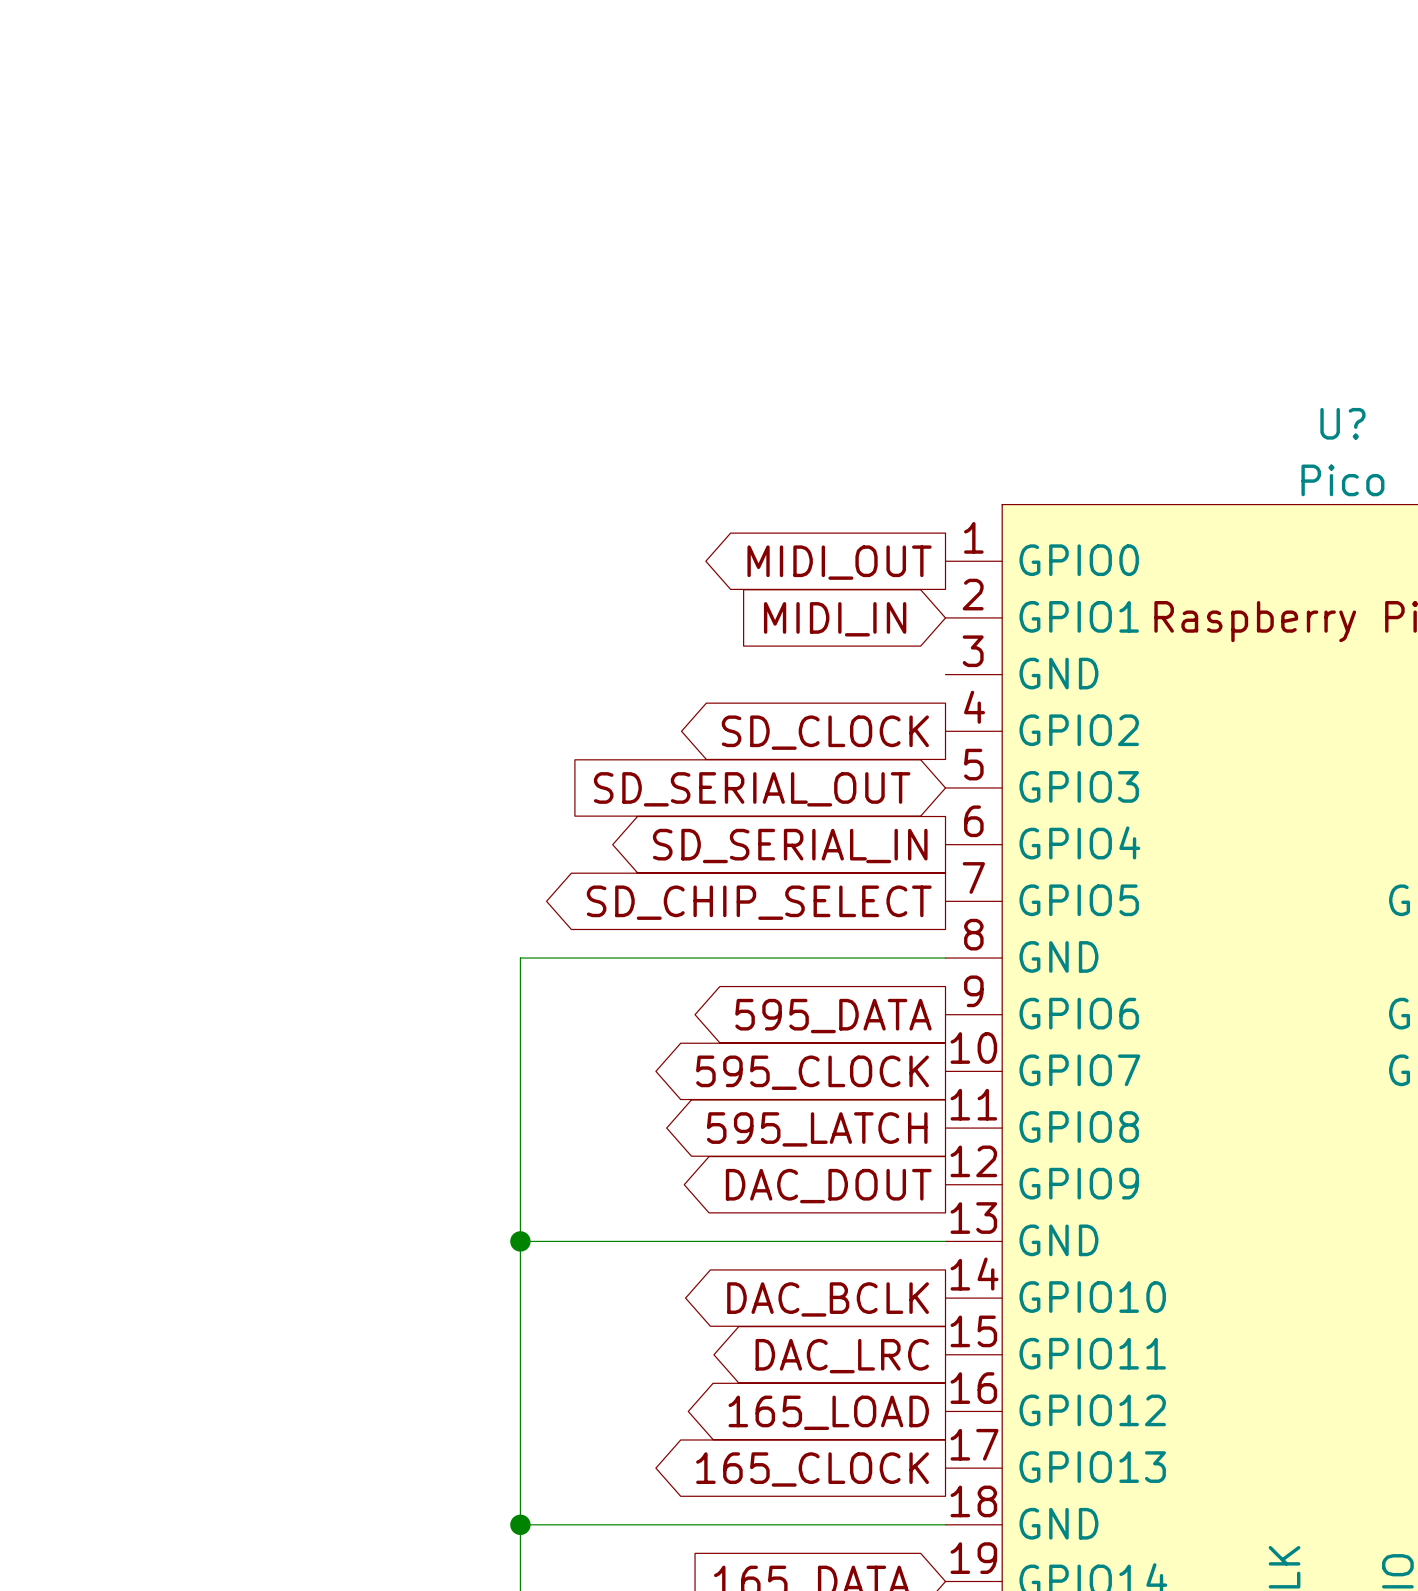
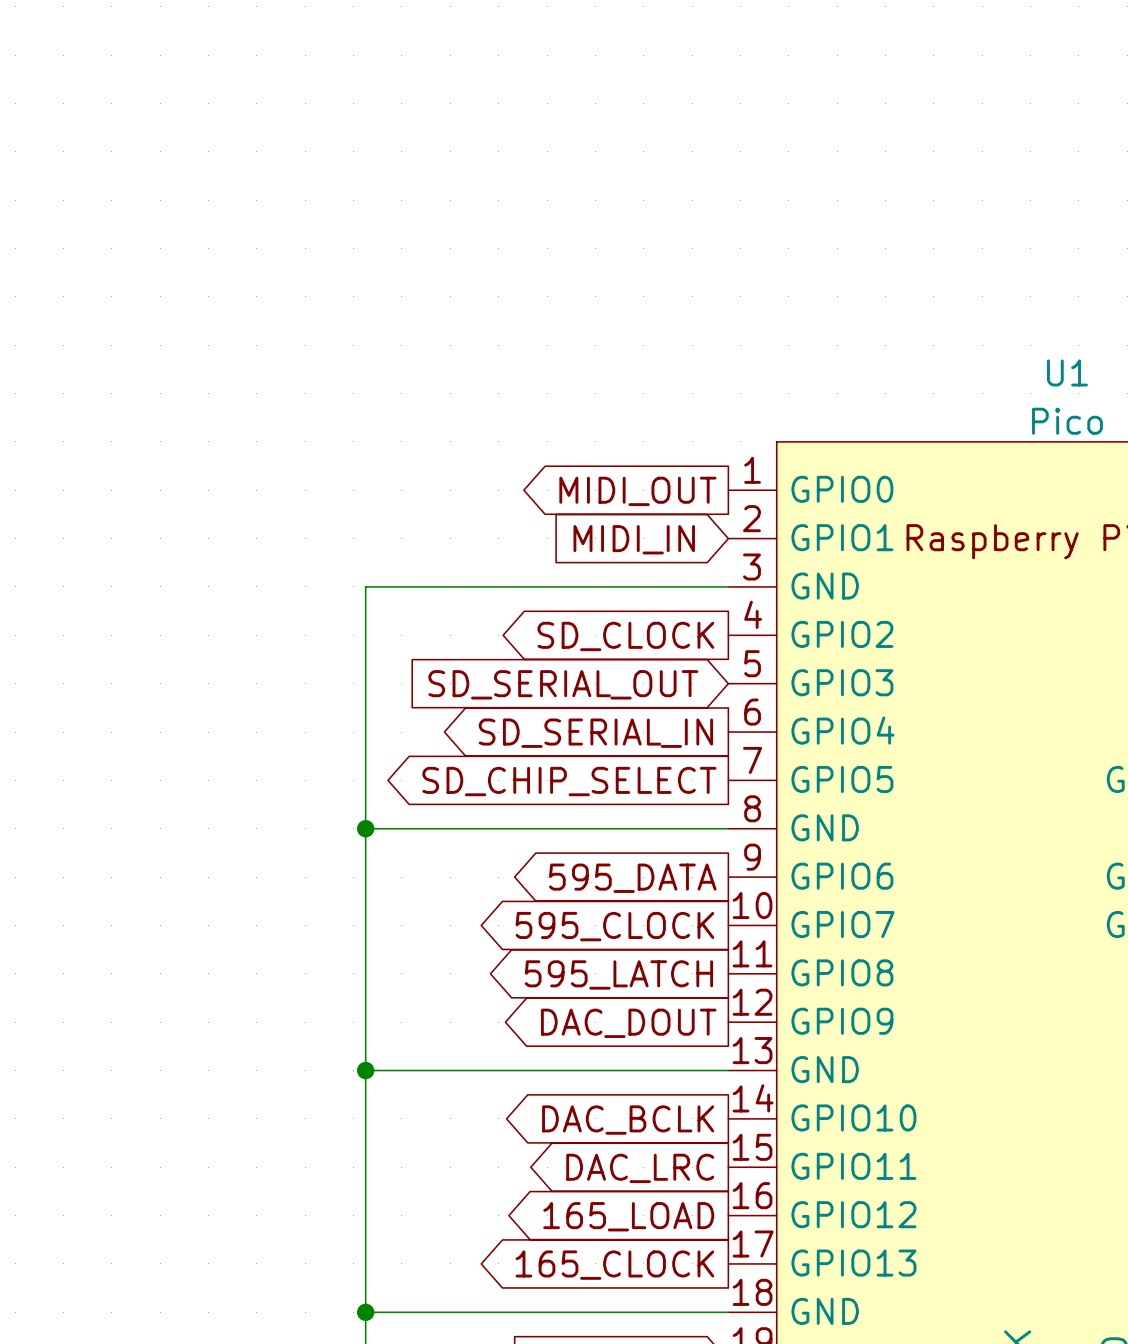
U? name: U? (1342, 423) -> U1 (1067, 372)
wire: none -> (728, 586) (365, 586) (365, 828)
junction: none -> (365, 828)

